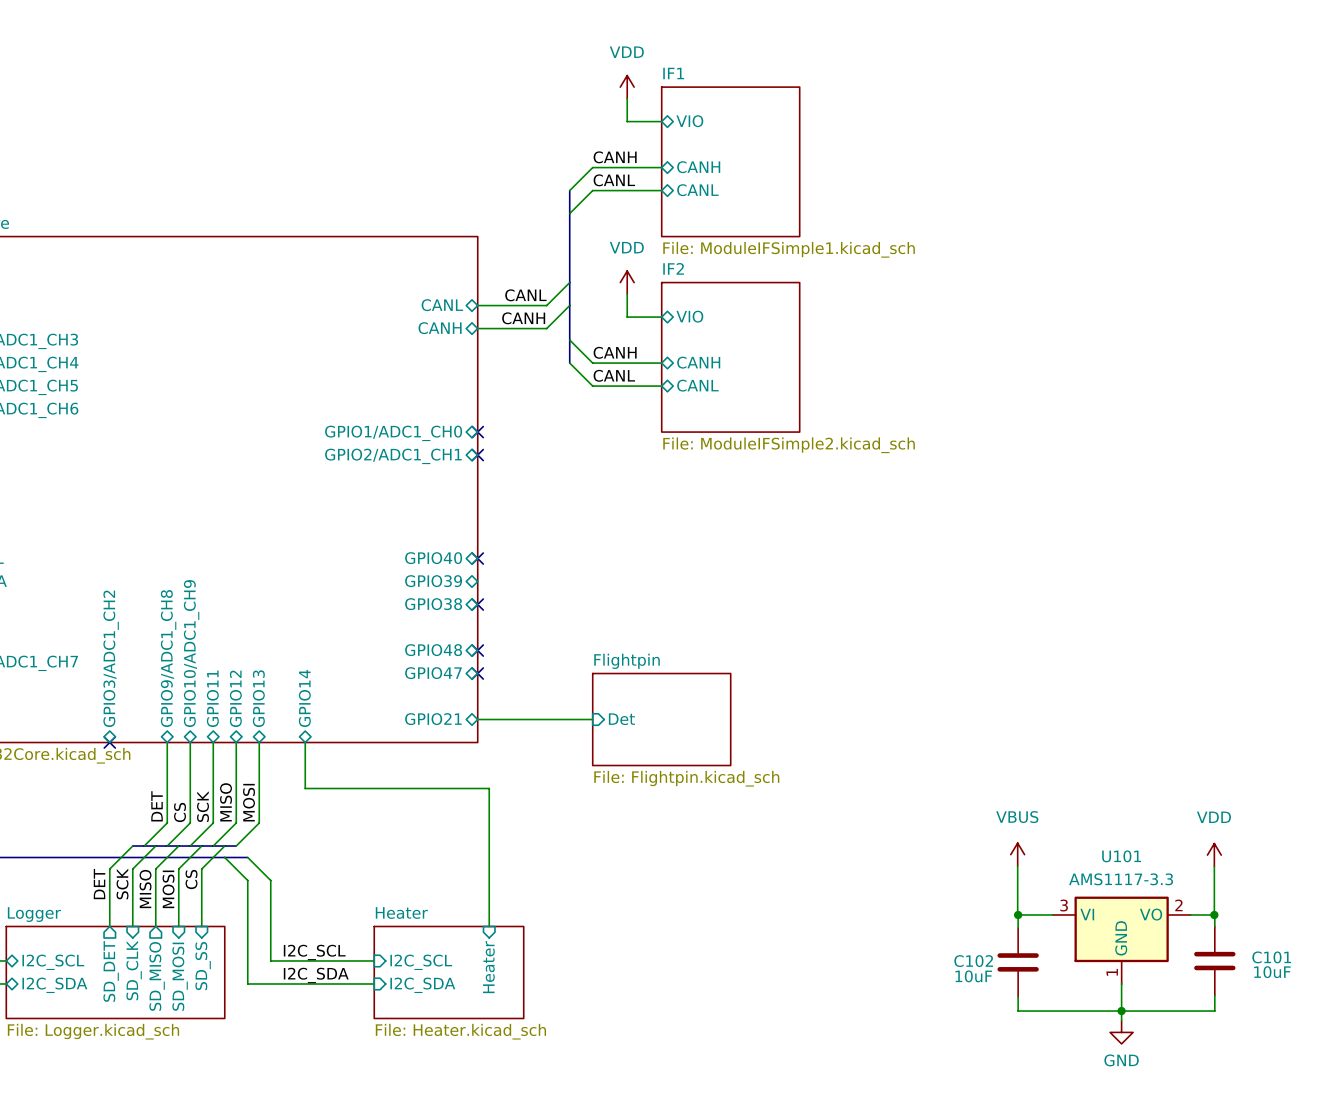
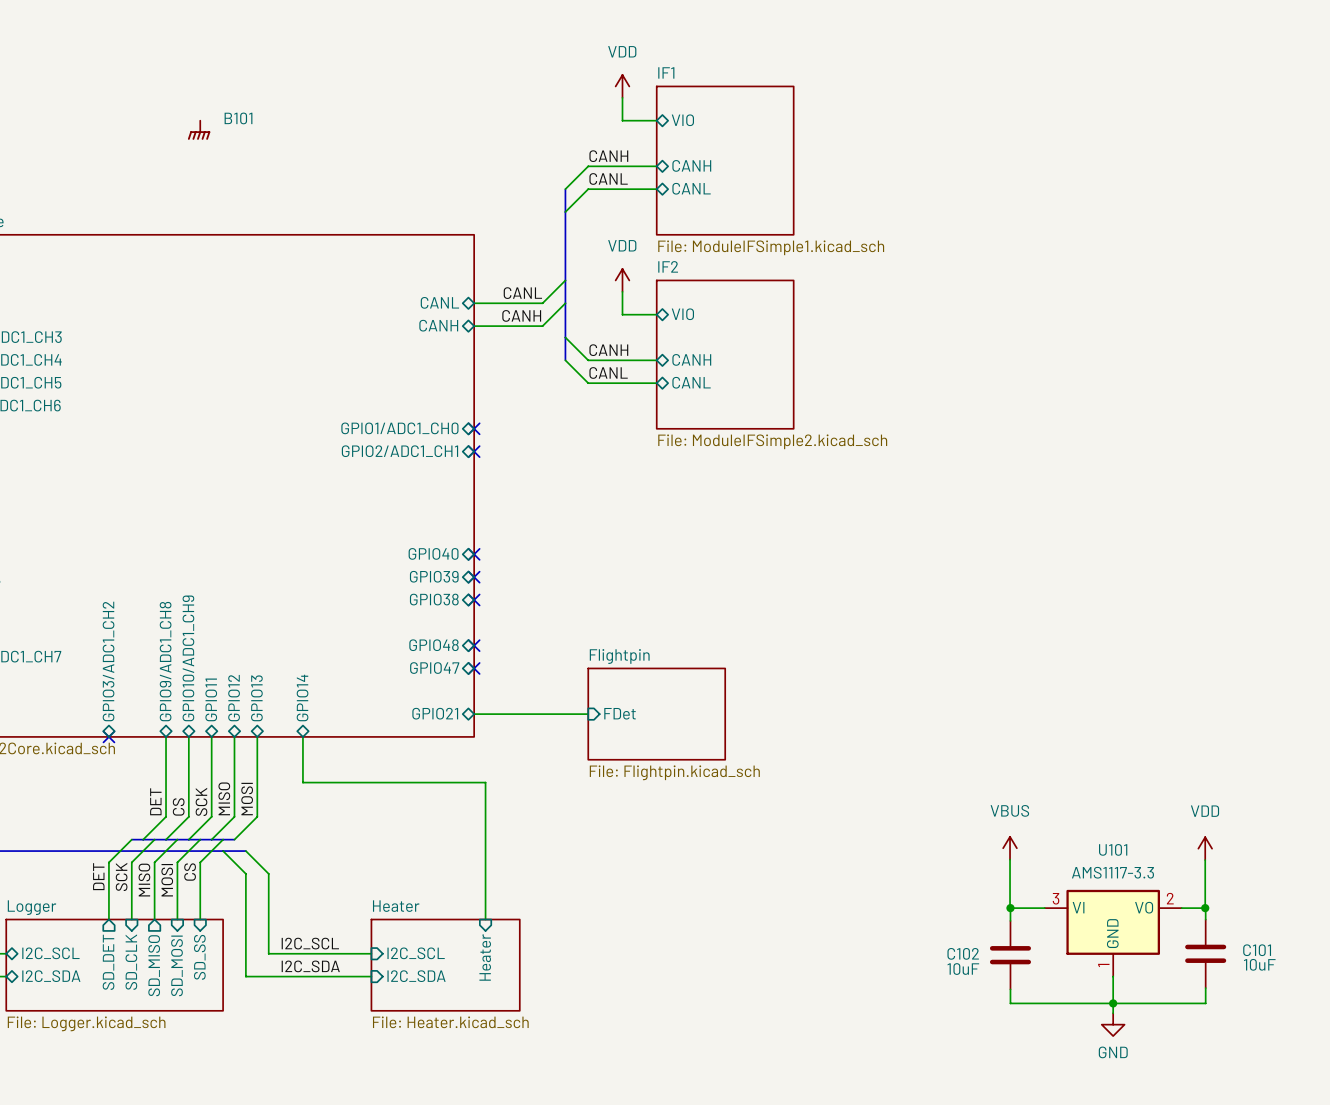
B101: none -> (199, 130)
no-connect mark: none -> (474, 577)
sheet pin: Det (621, 719) -> FDet (620, 713)

